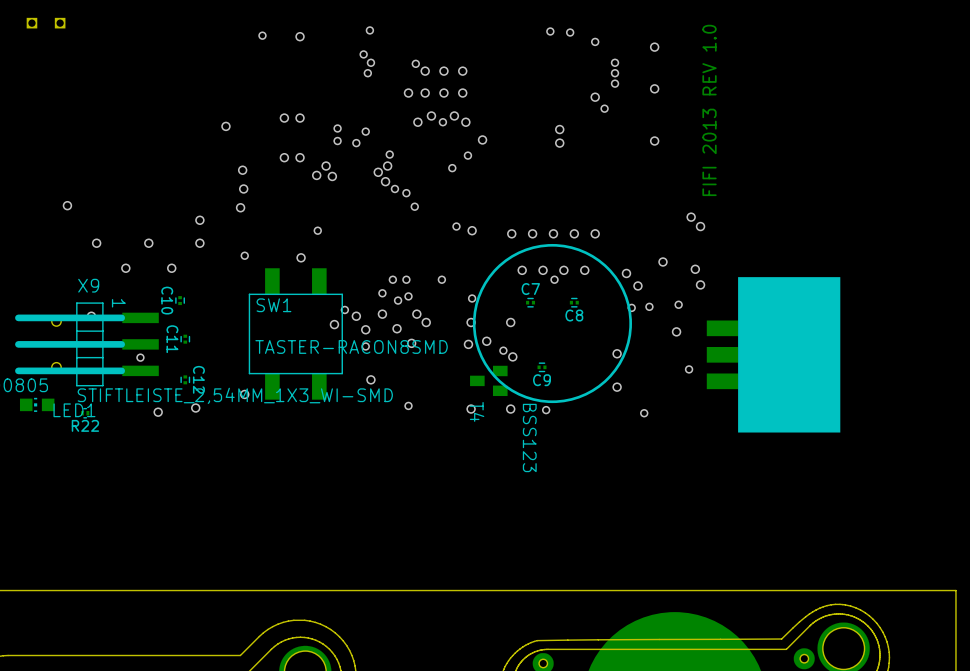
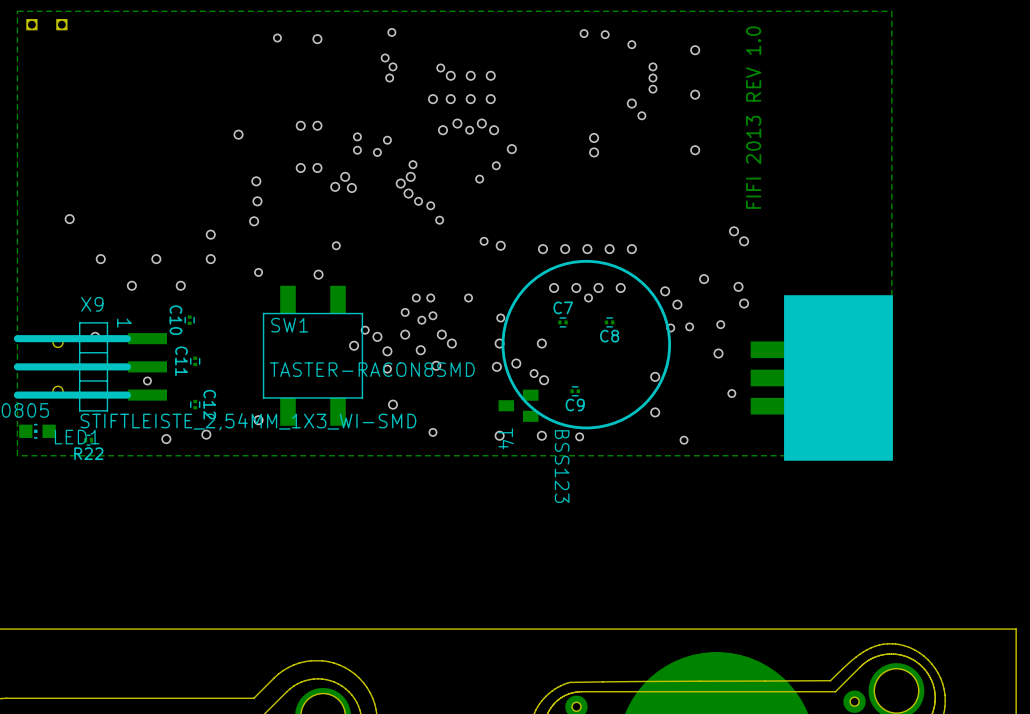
zone outline: none -> (891, 11) (891, 455) (17, 455) (17, 11) (891, 11)

